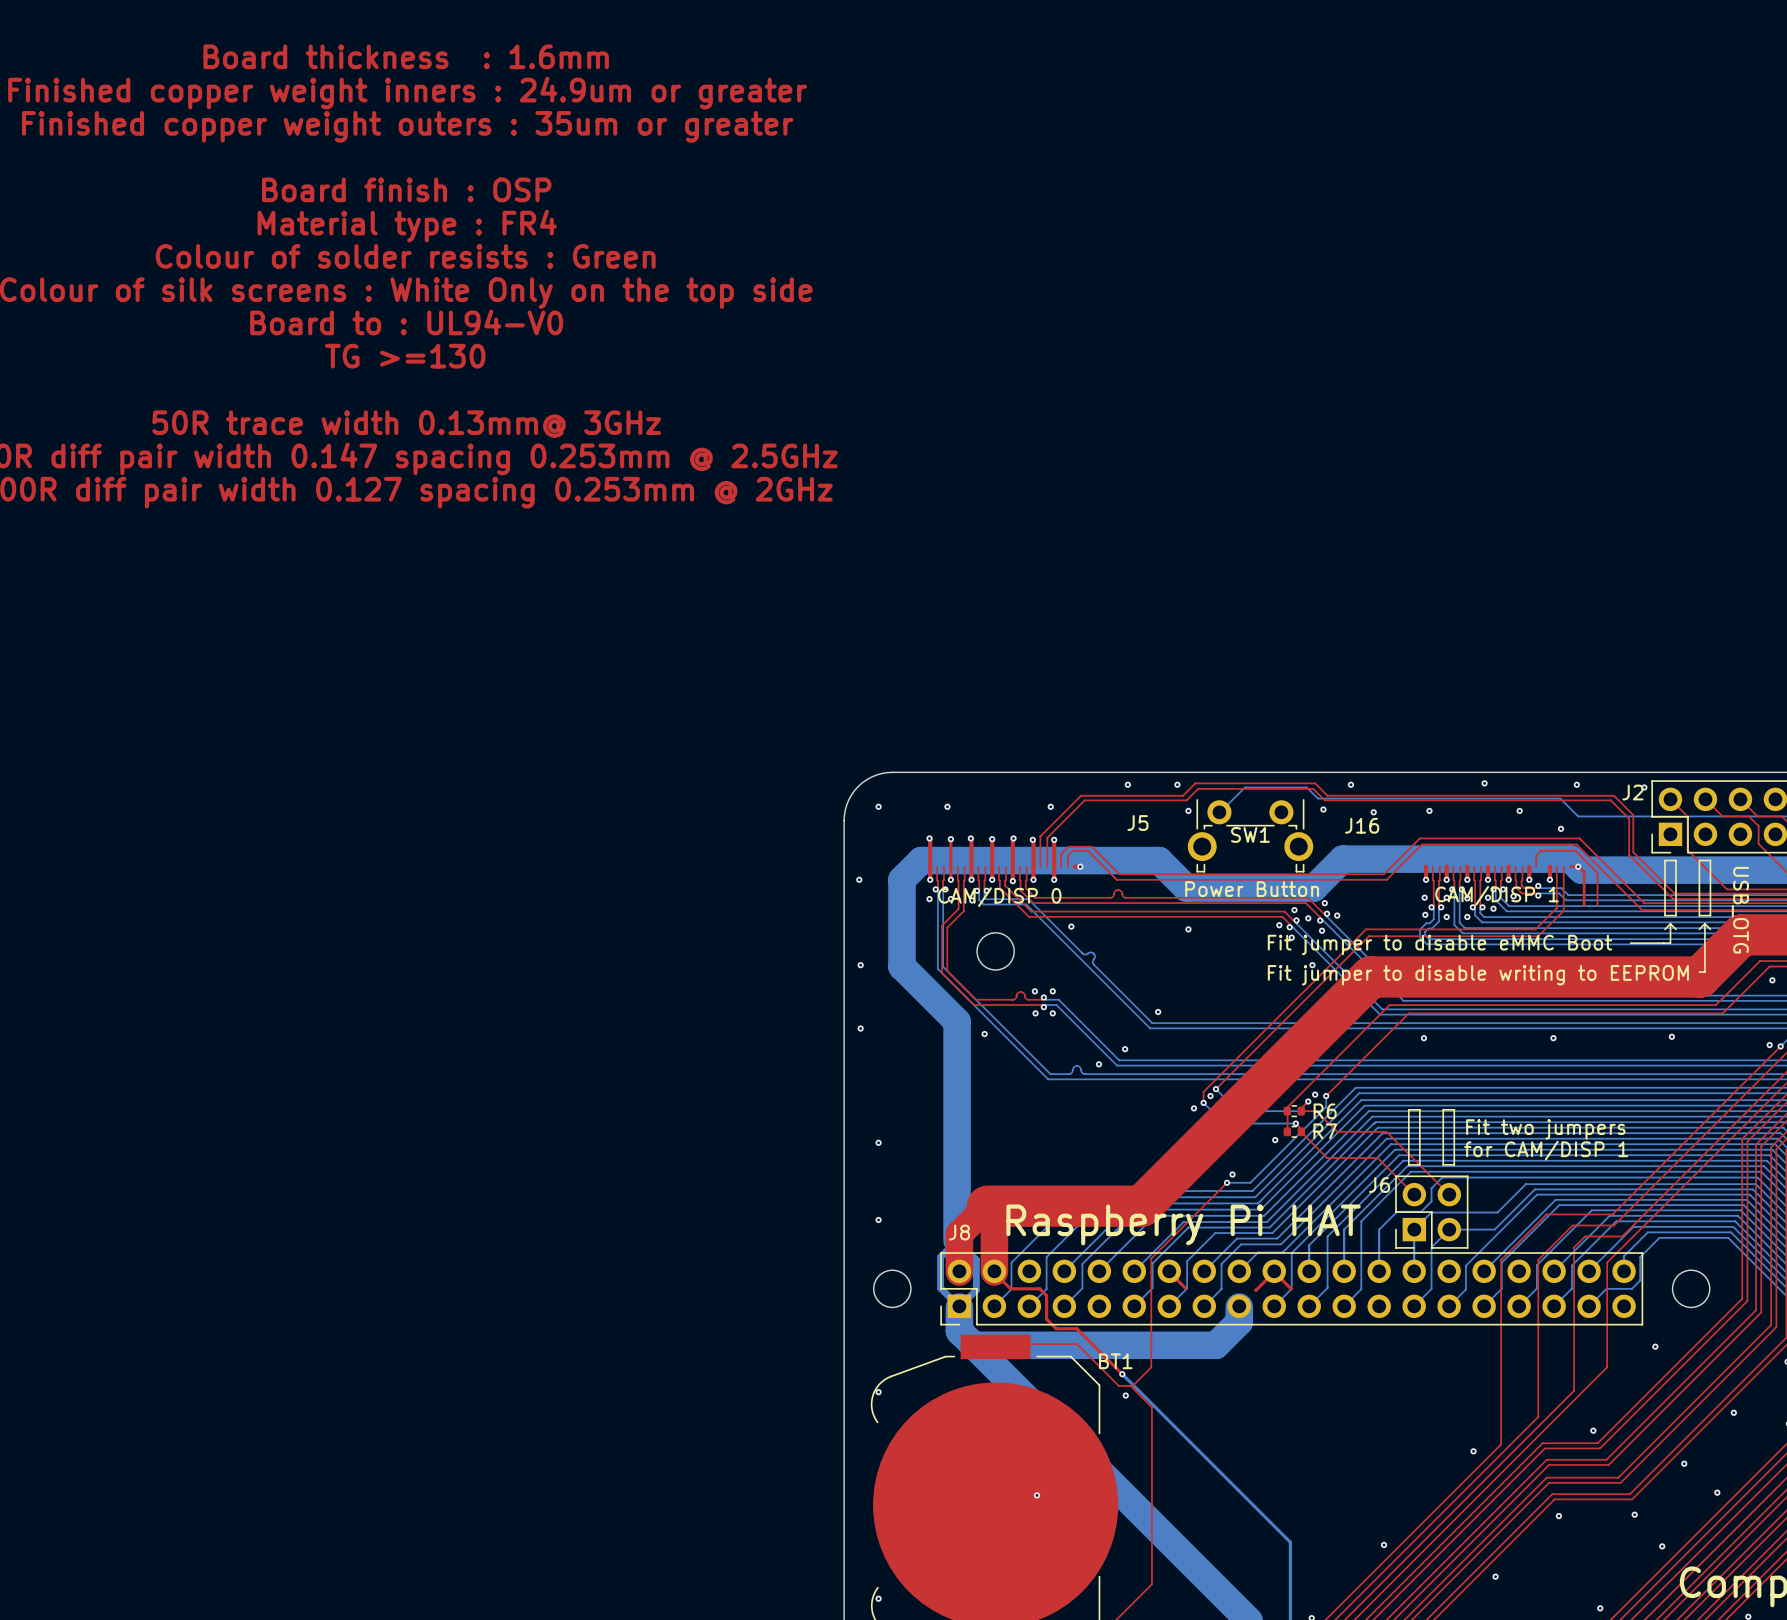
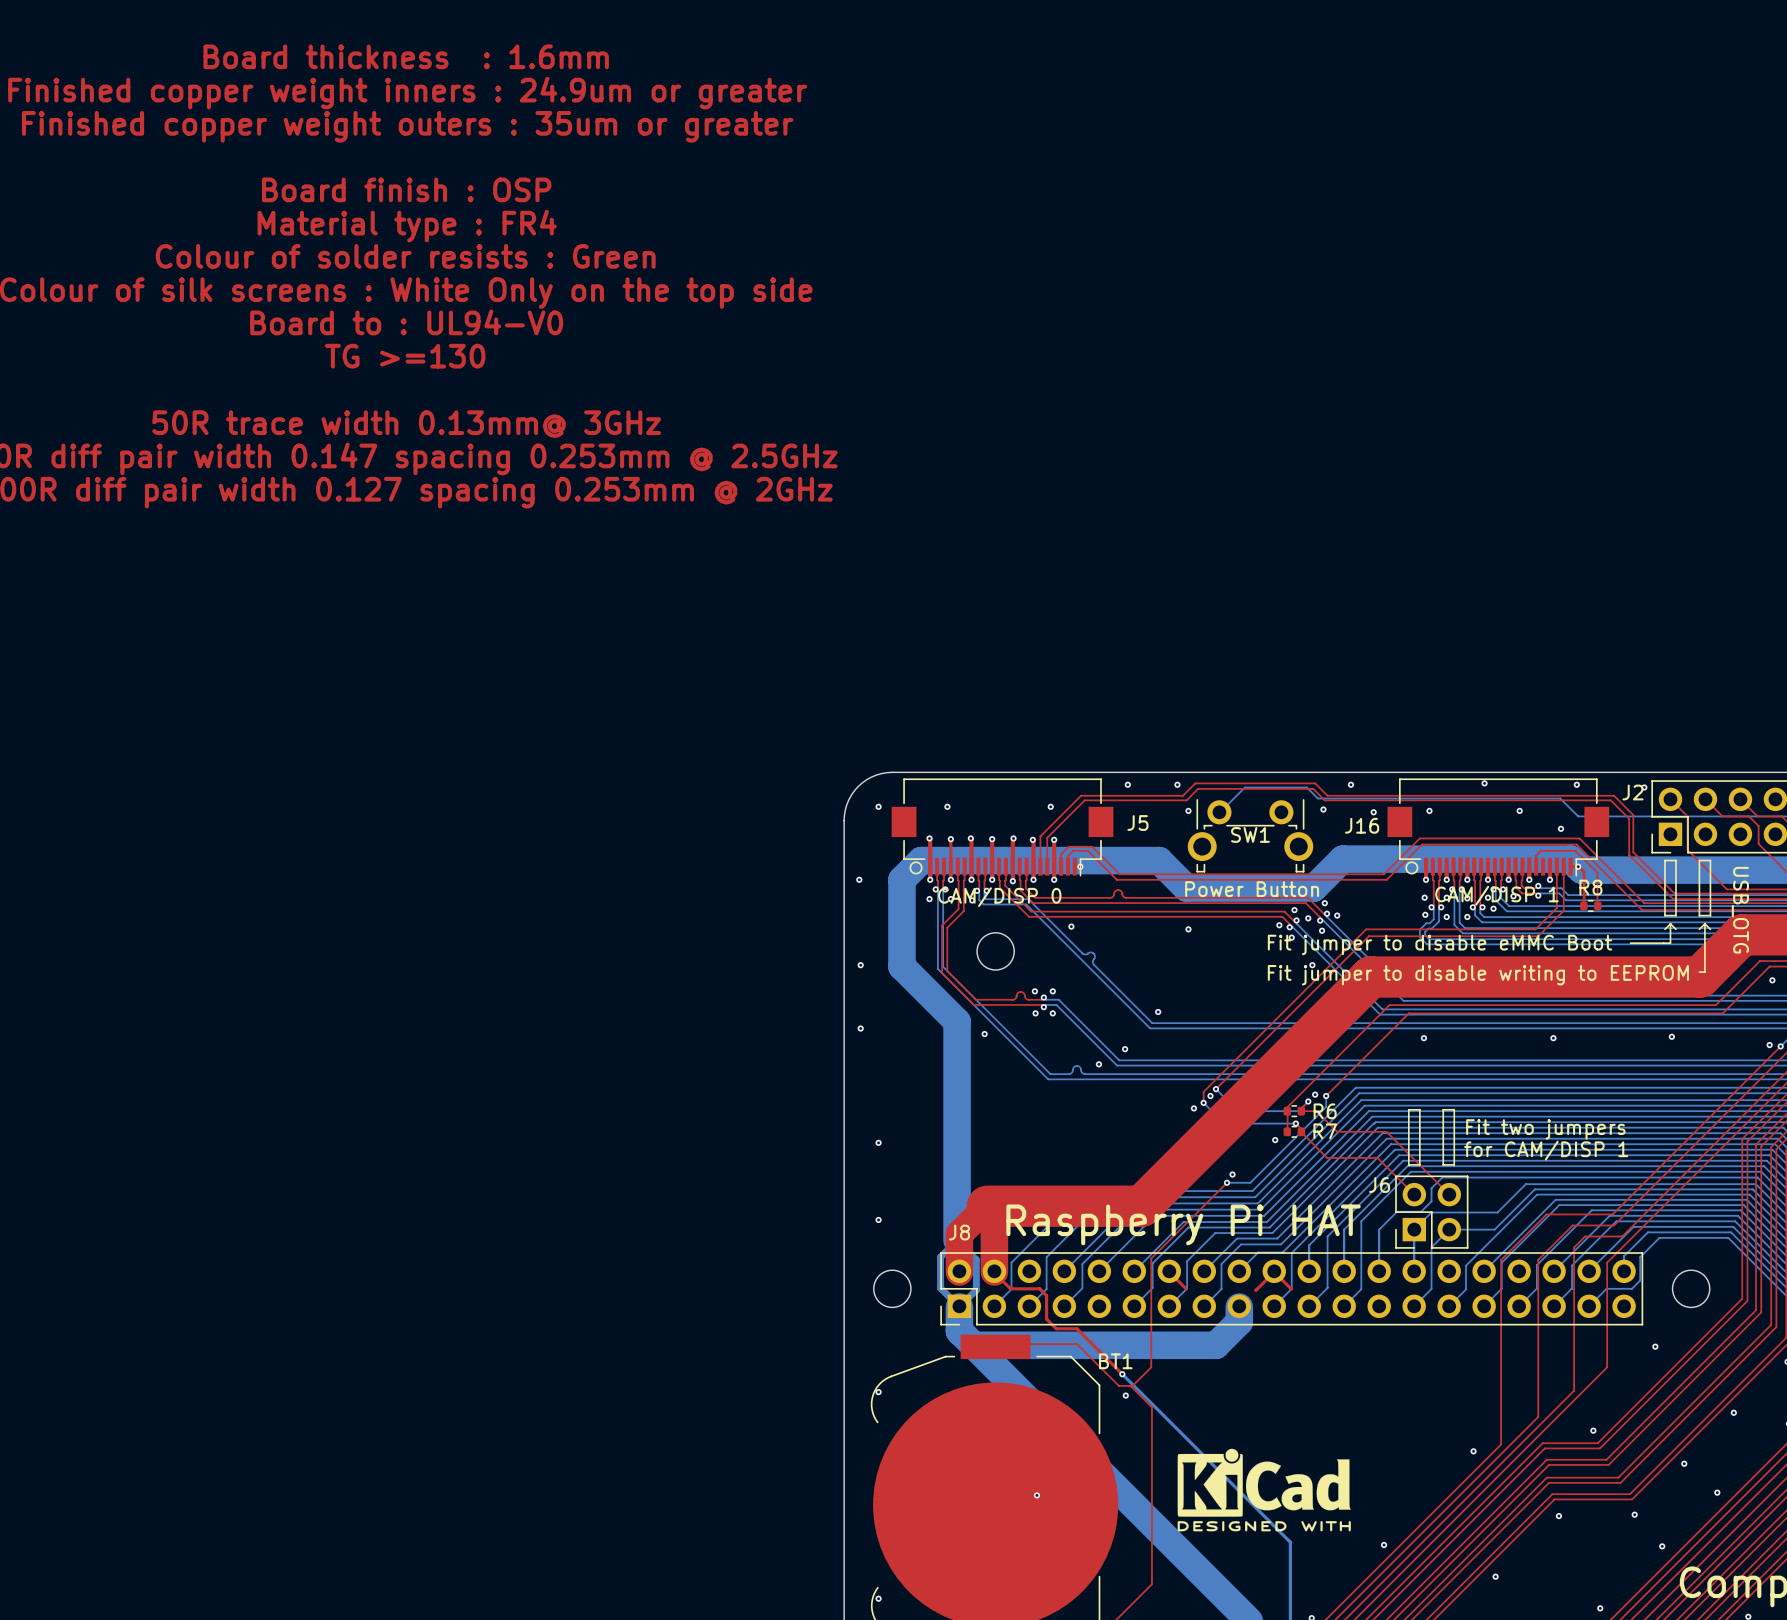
part: none -> (1002, 827)
part: none -> (1498, 827)
R8: none -> (1590, 905)
drawing: none -> [1177, 1448, 1351, 1532]

